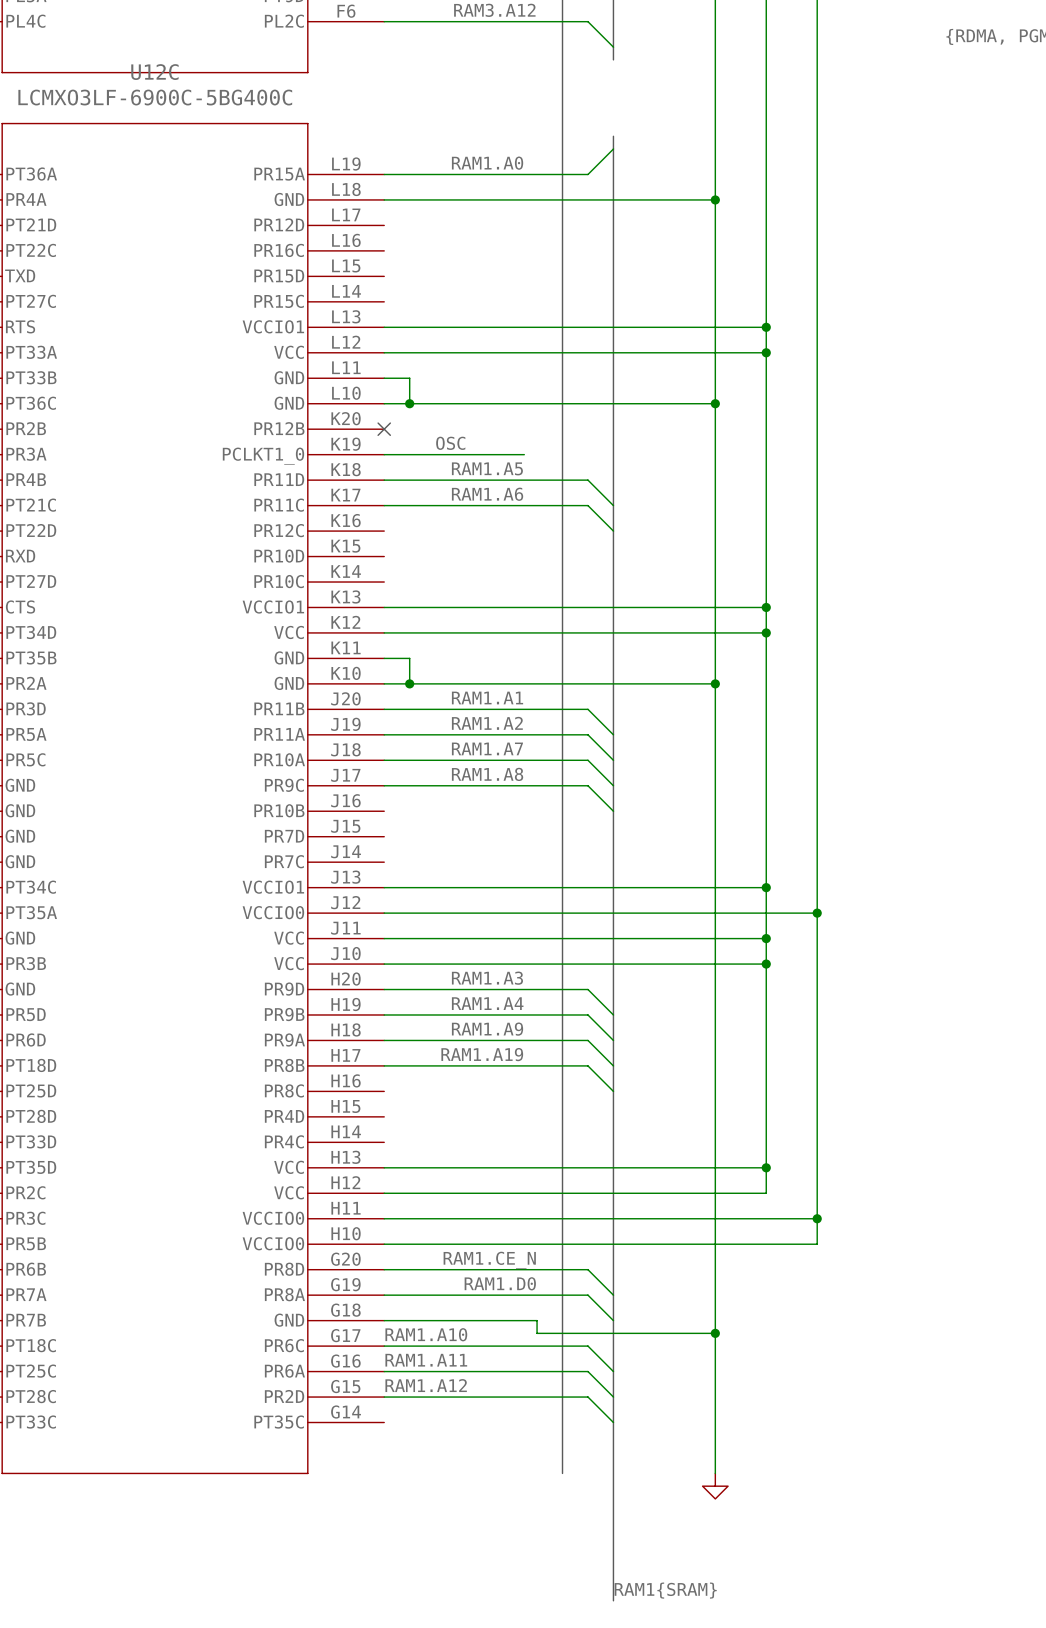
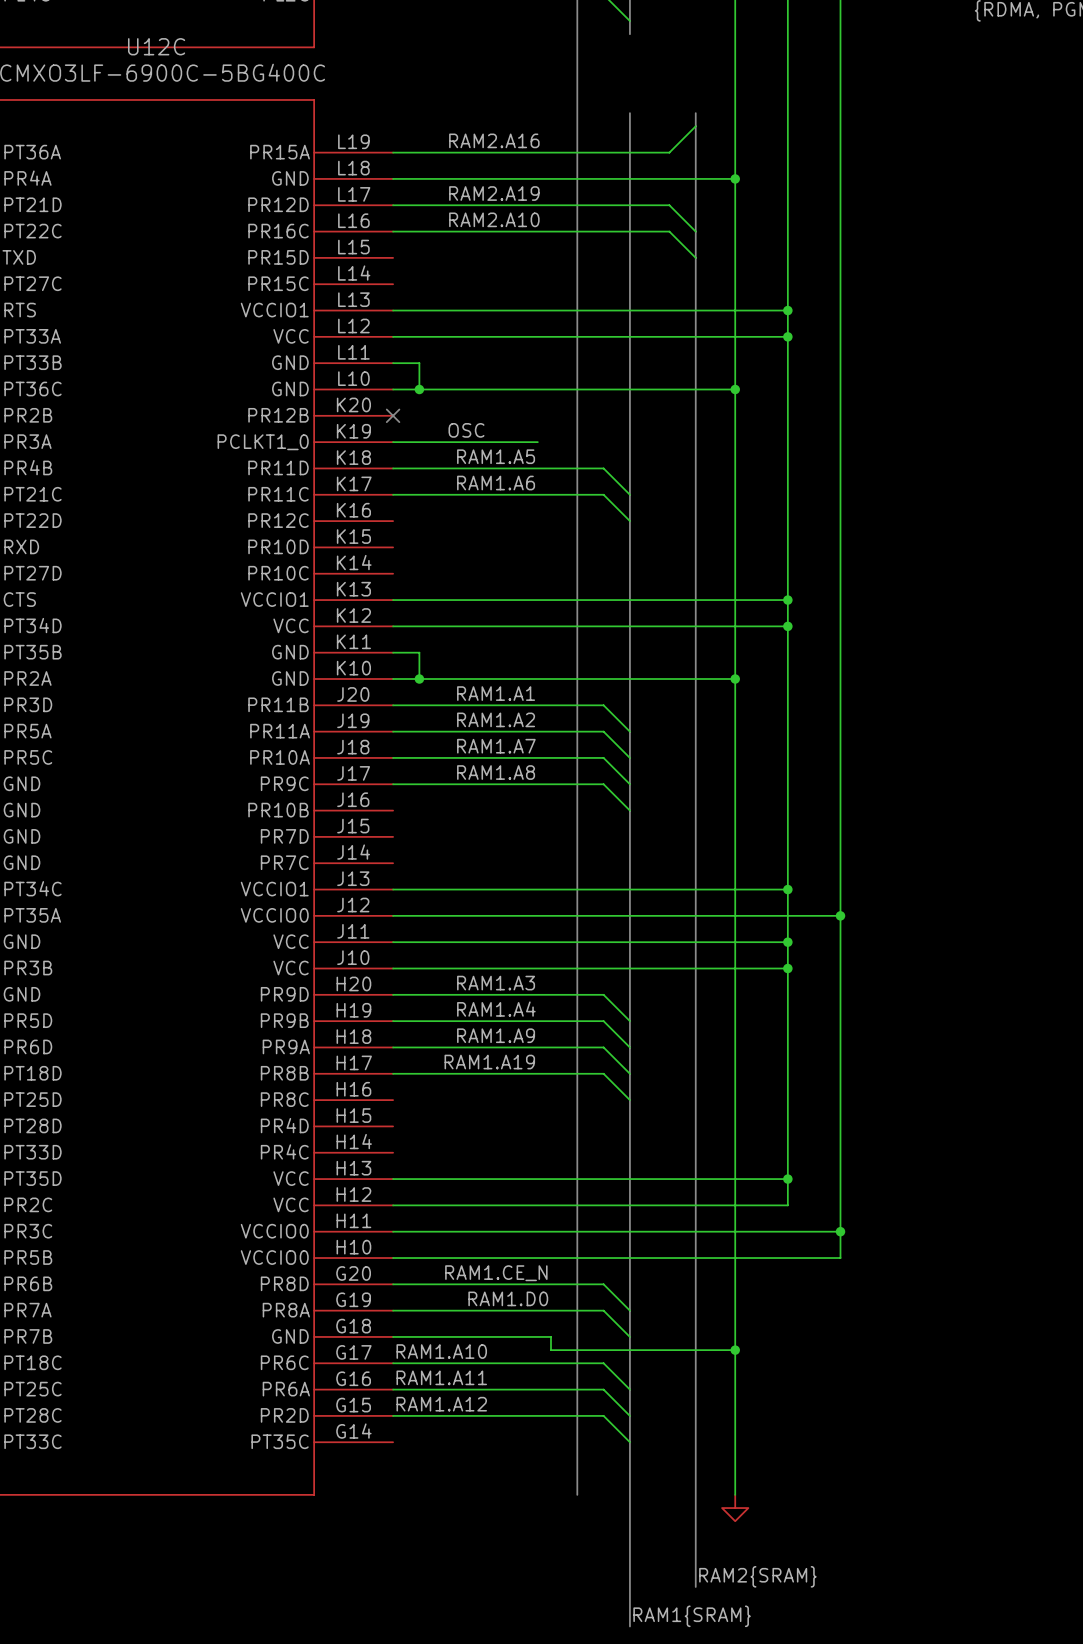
bus: none -> (695, 113) (695, 1587)
wire: (613, 149) (587, 174) -> (695, 126) (669, 152) (603, 152)
label: RAM1.A0 (487, 163) -> RAM2.A16 (494, 140)
label: none -> RAM2.A19 (494, 193)
wire: none -> (393, 205) (669, 205) (695, 231)
label: none -> RAM2.A10 (494, 219)
wire: none -> (393, 231) (669, 231) (695, 257)
label: none -> RAM2{SRAM} (757, 1576)

